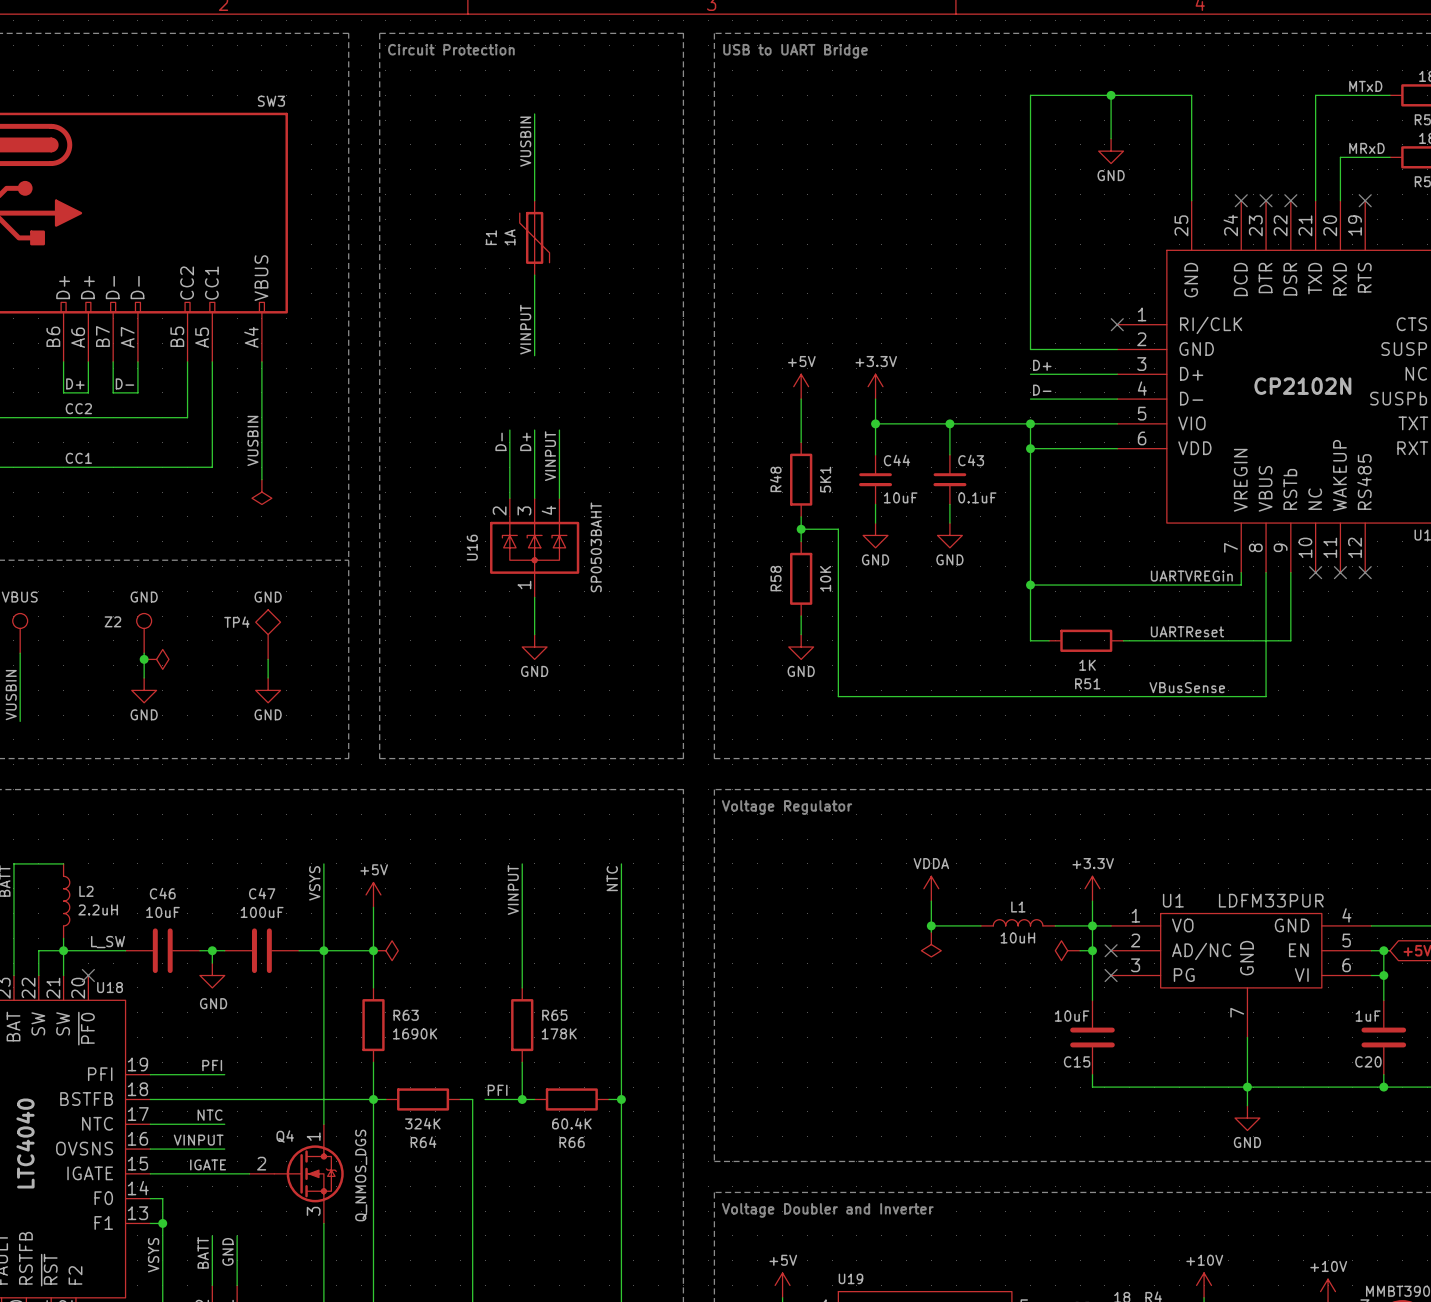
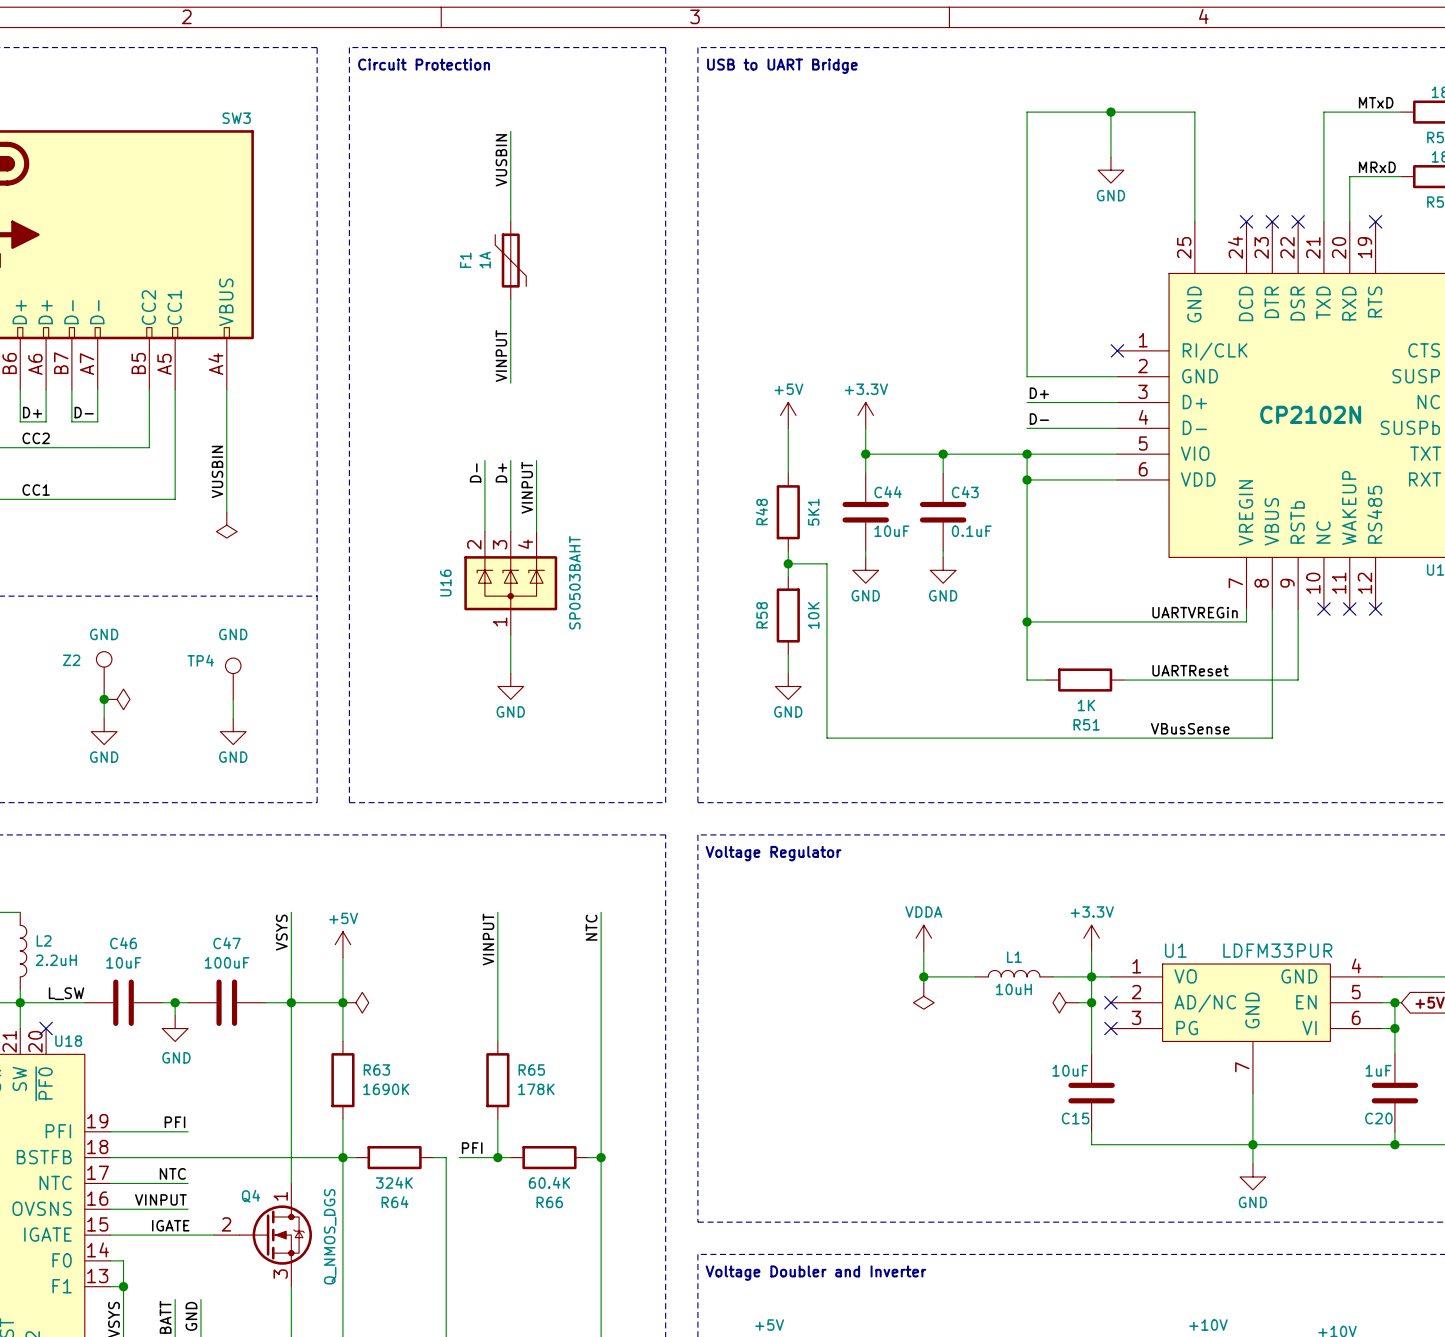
C44 symbol: [859, 454, 893, 505] -> [842, 473, 889, 551]
C43 symbol: [933, 454, 967, 505] -> [919, 473, 967, 551]
TP4 symbol: [255, 609, 281, 660] -> [225, 658, 241, 700]

